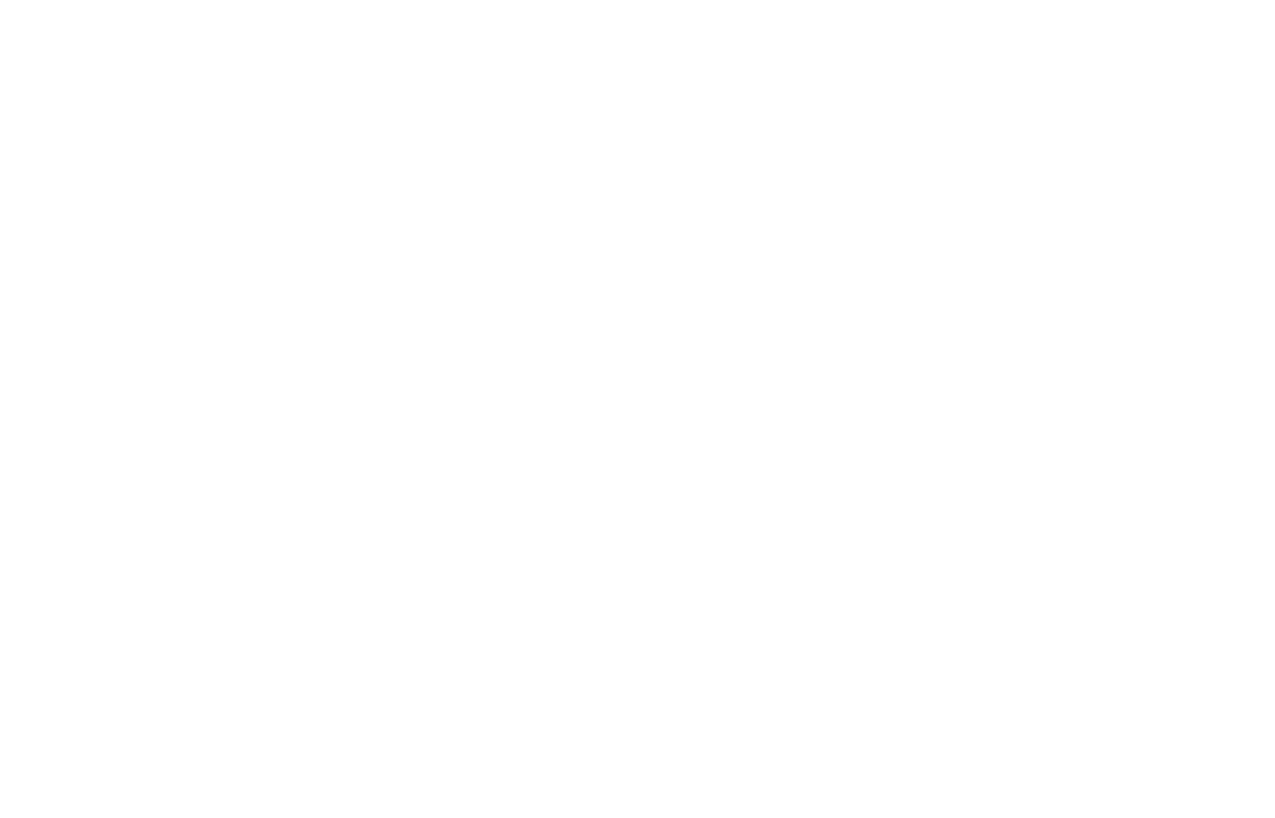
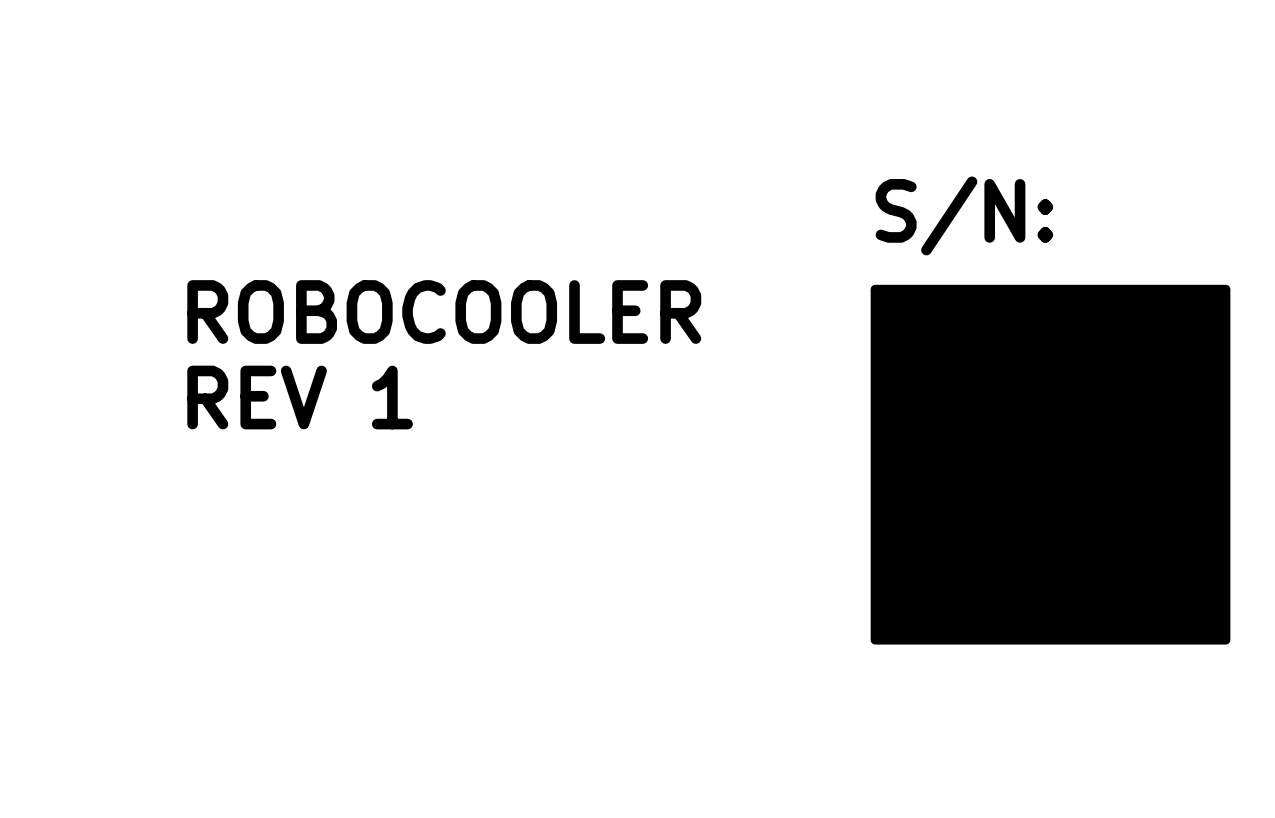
text: none -> S/N: (964, 215)
drawing: none -> [870, 284, 1231, 645]
text: none -> ROBOCOOLER (444, 312)
text: none -> REV 1 (300, 397)

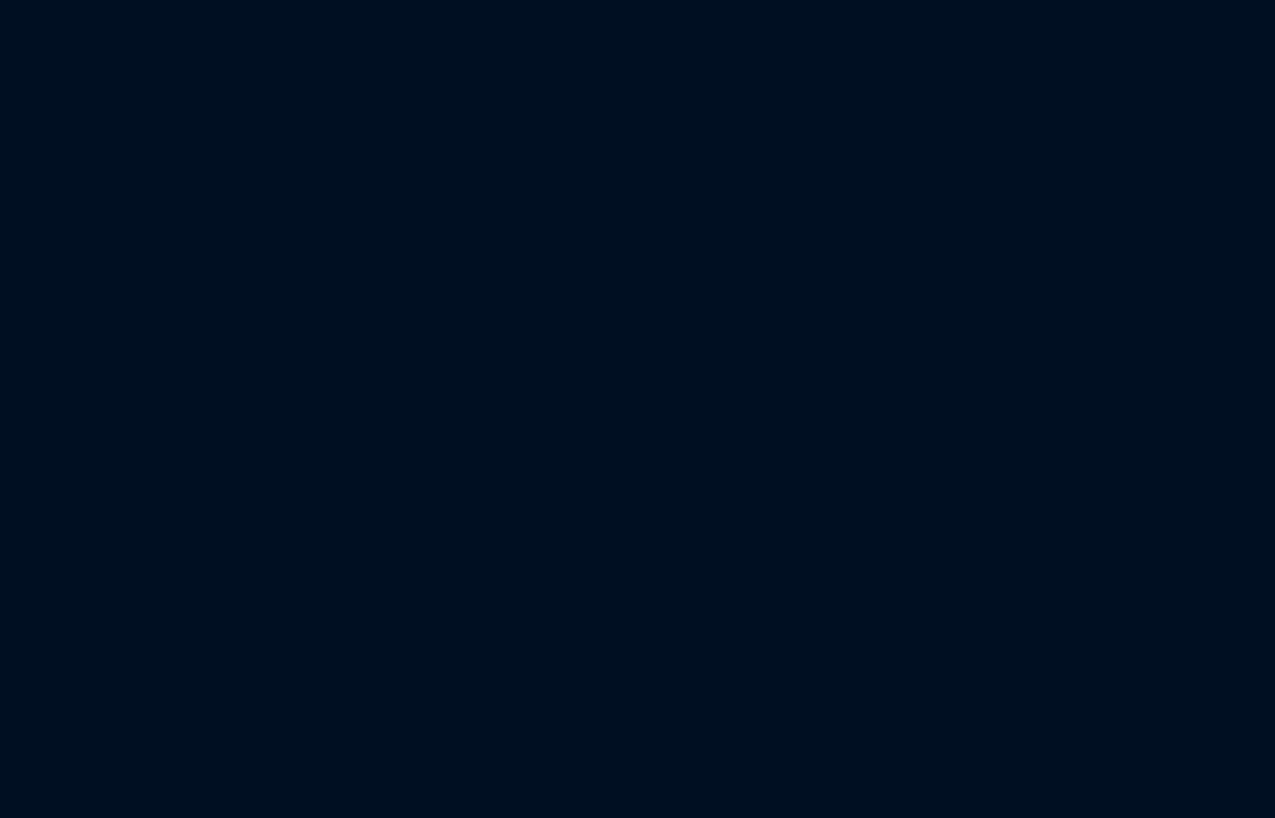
text: S/N: (964, 215) -> none
drawing: [870, 284, 1231, 645] -> none
text: ROBOCOOLER (444, 312) -> none
text: REV 1 (300, 397) -> none

